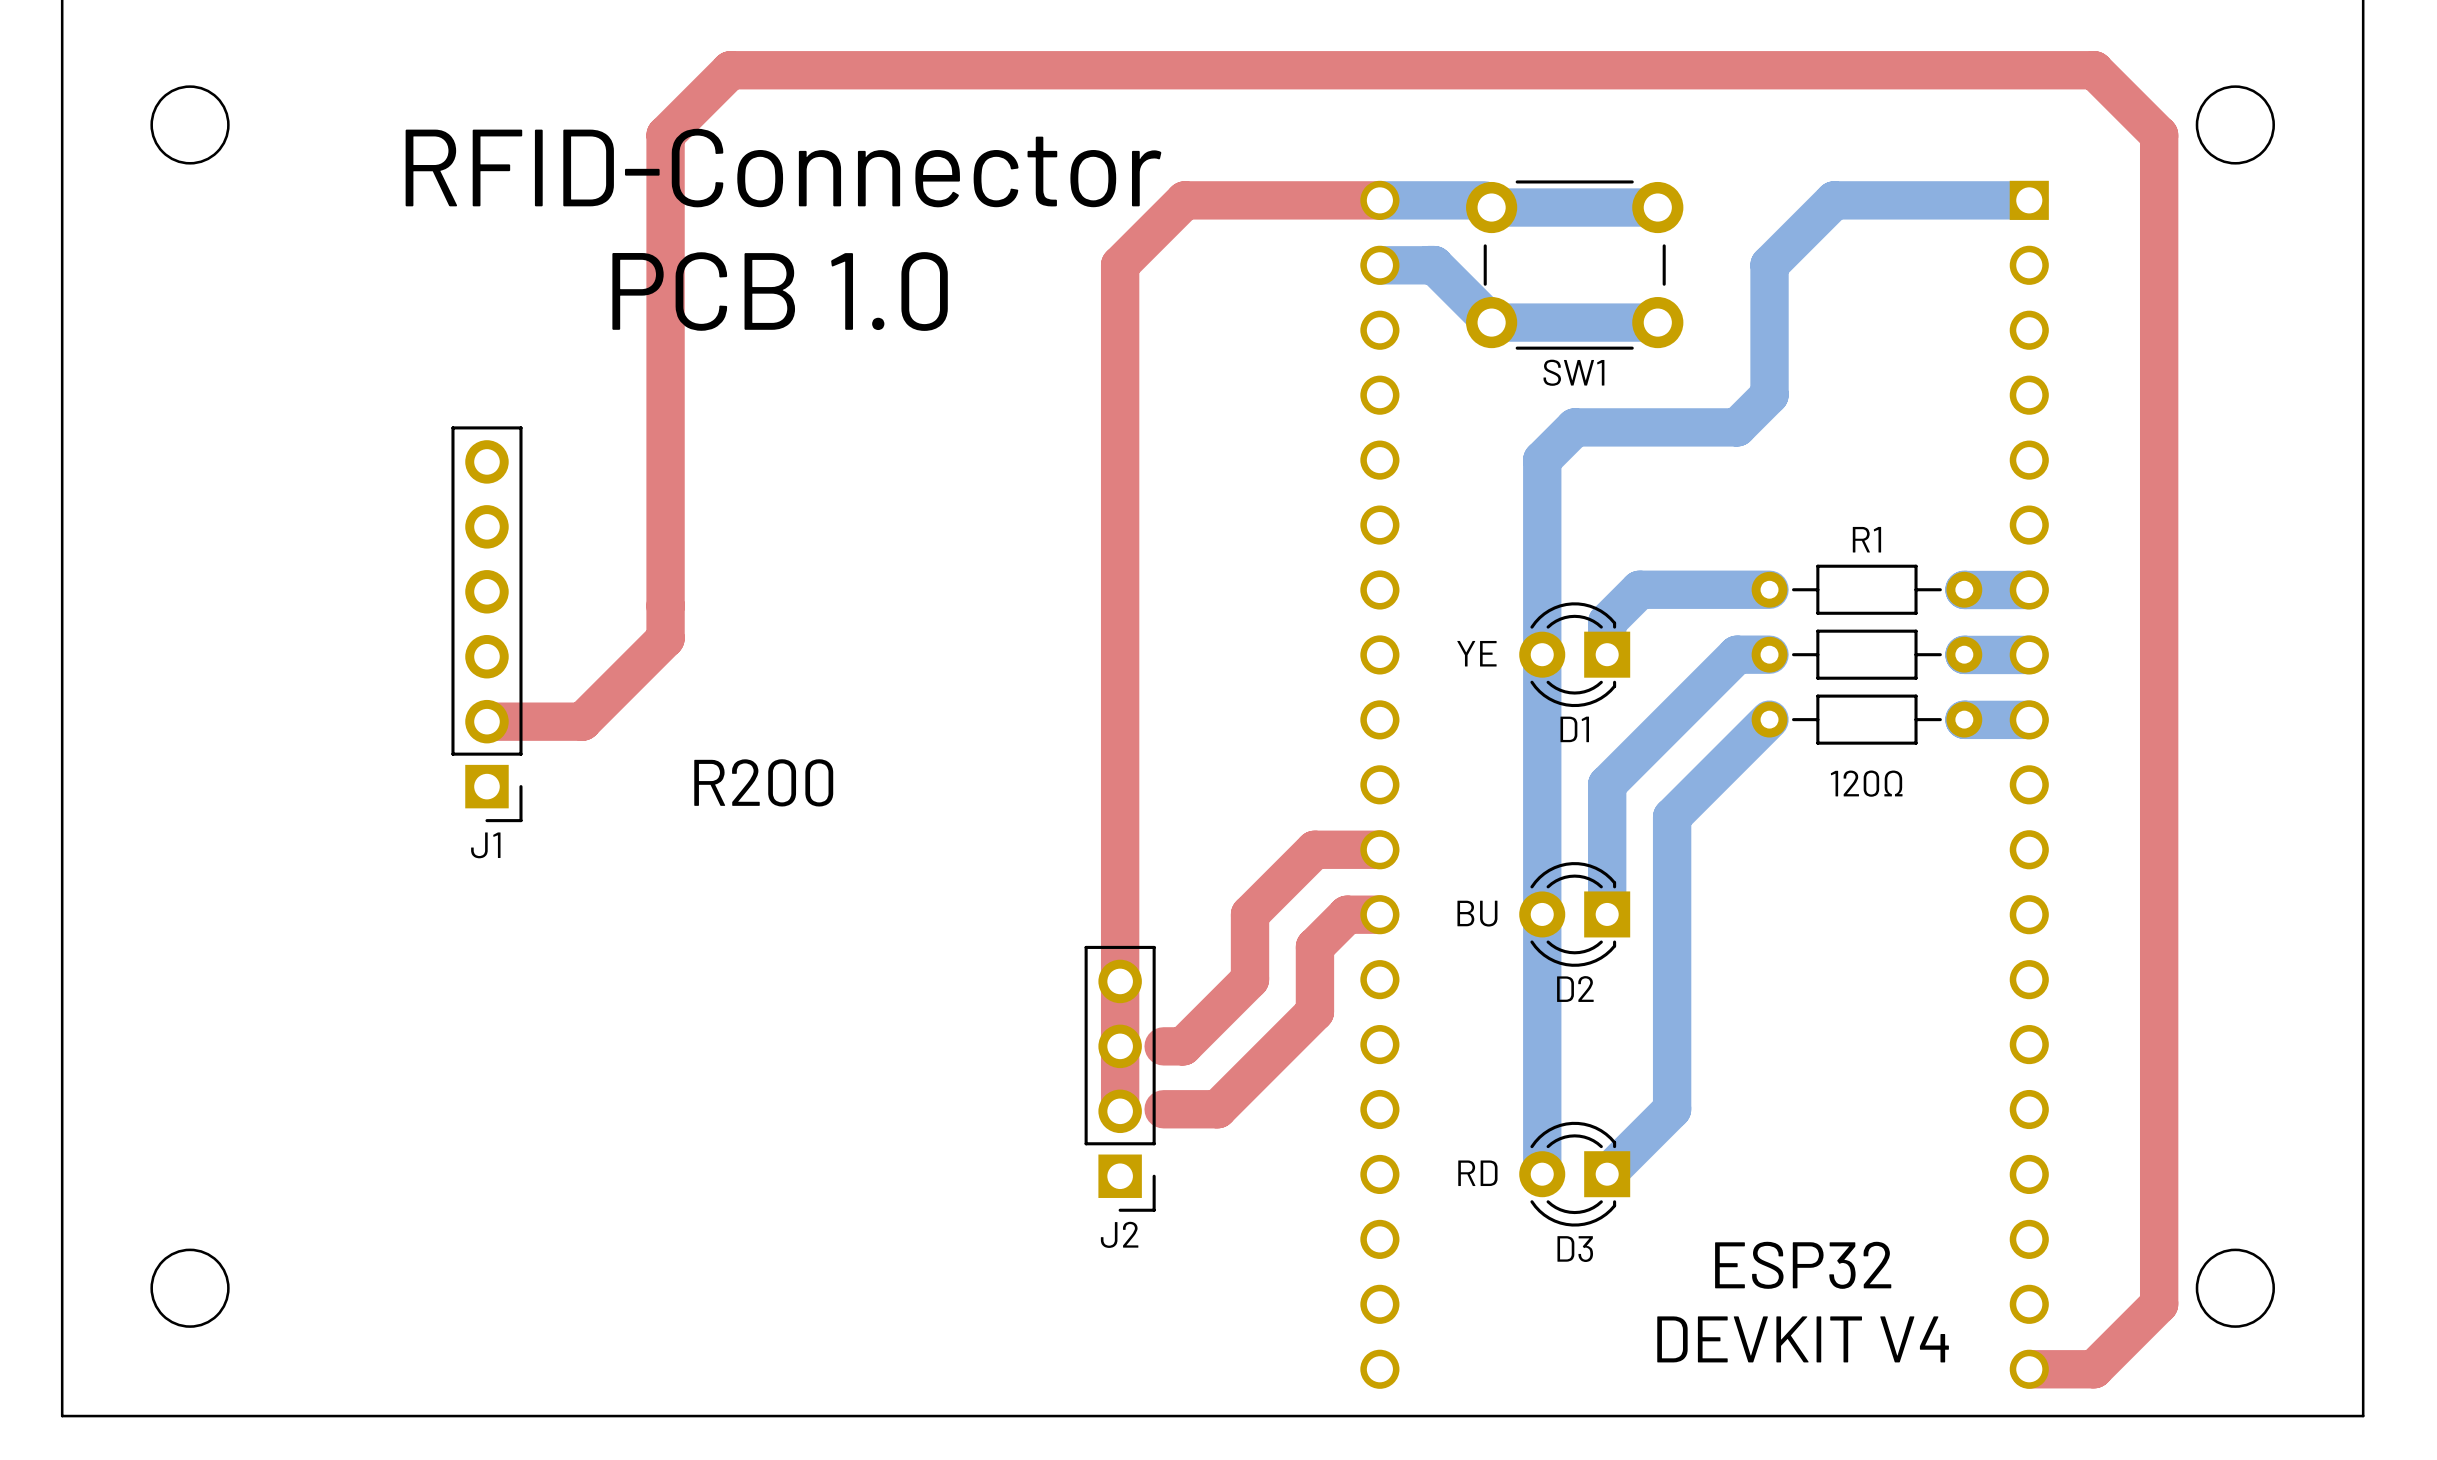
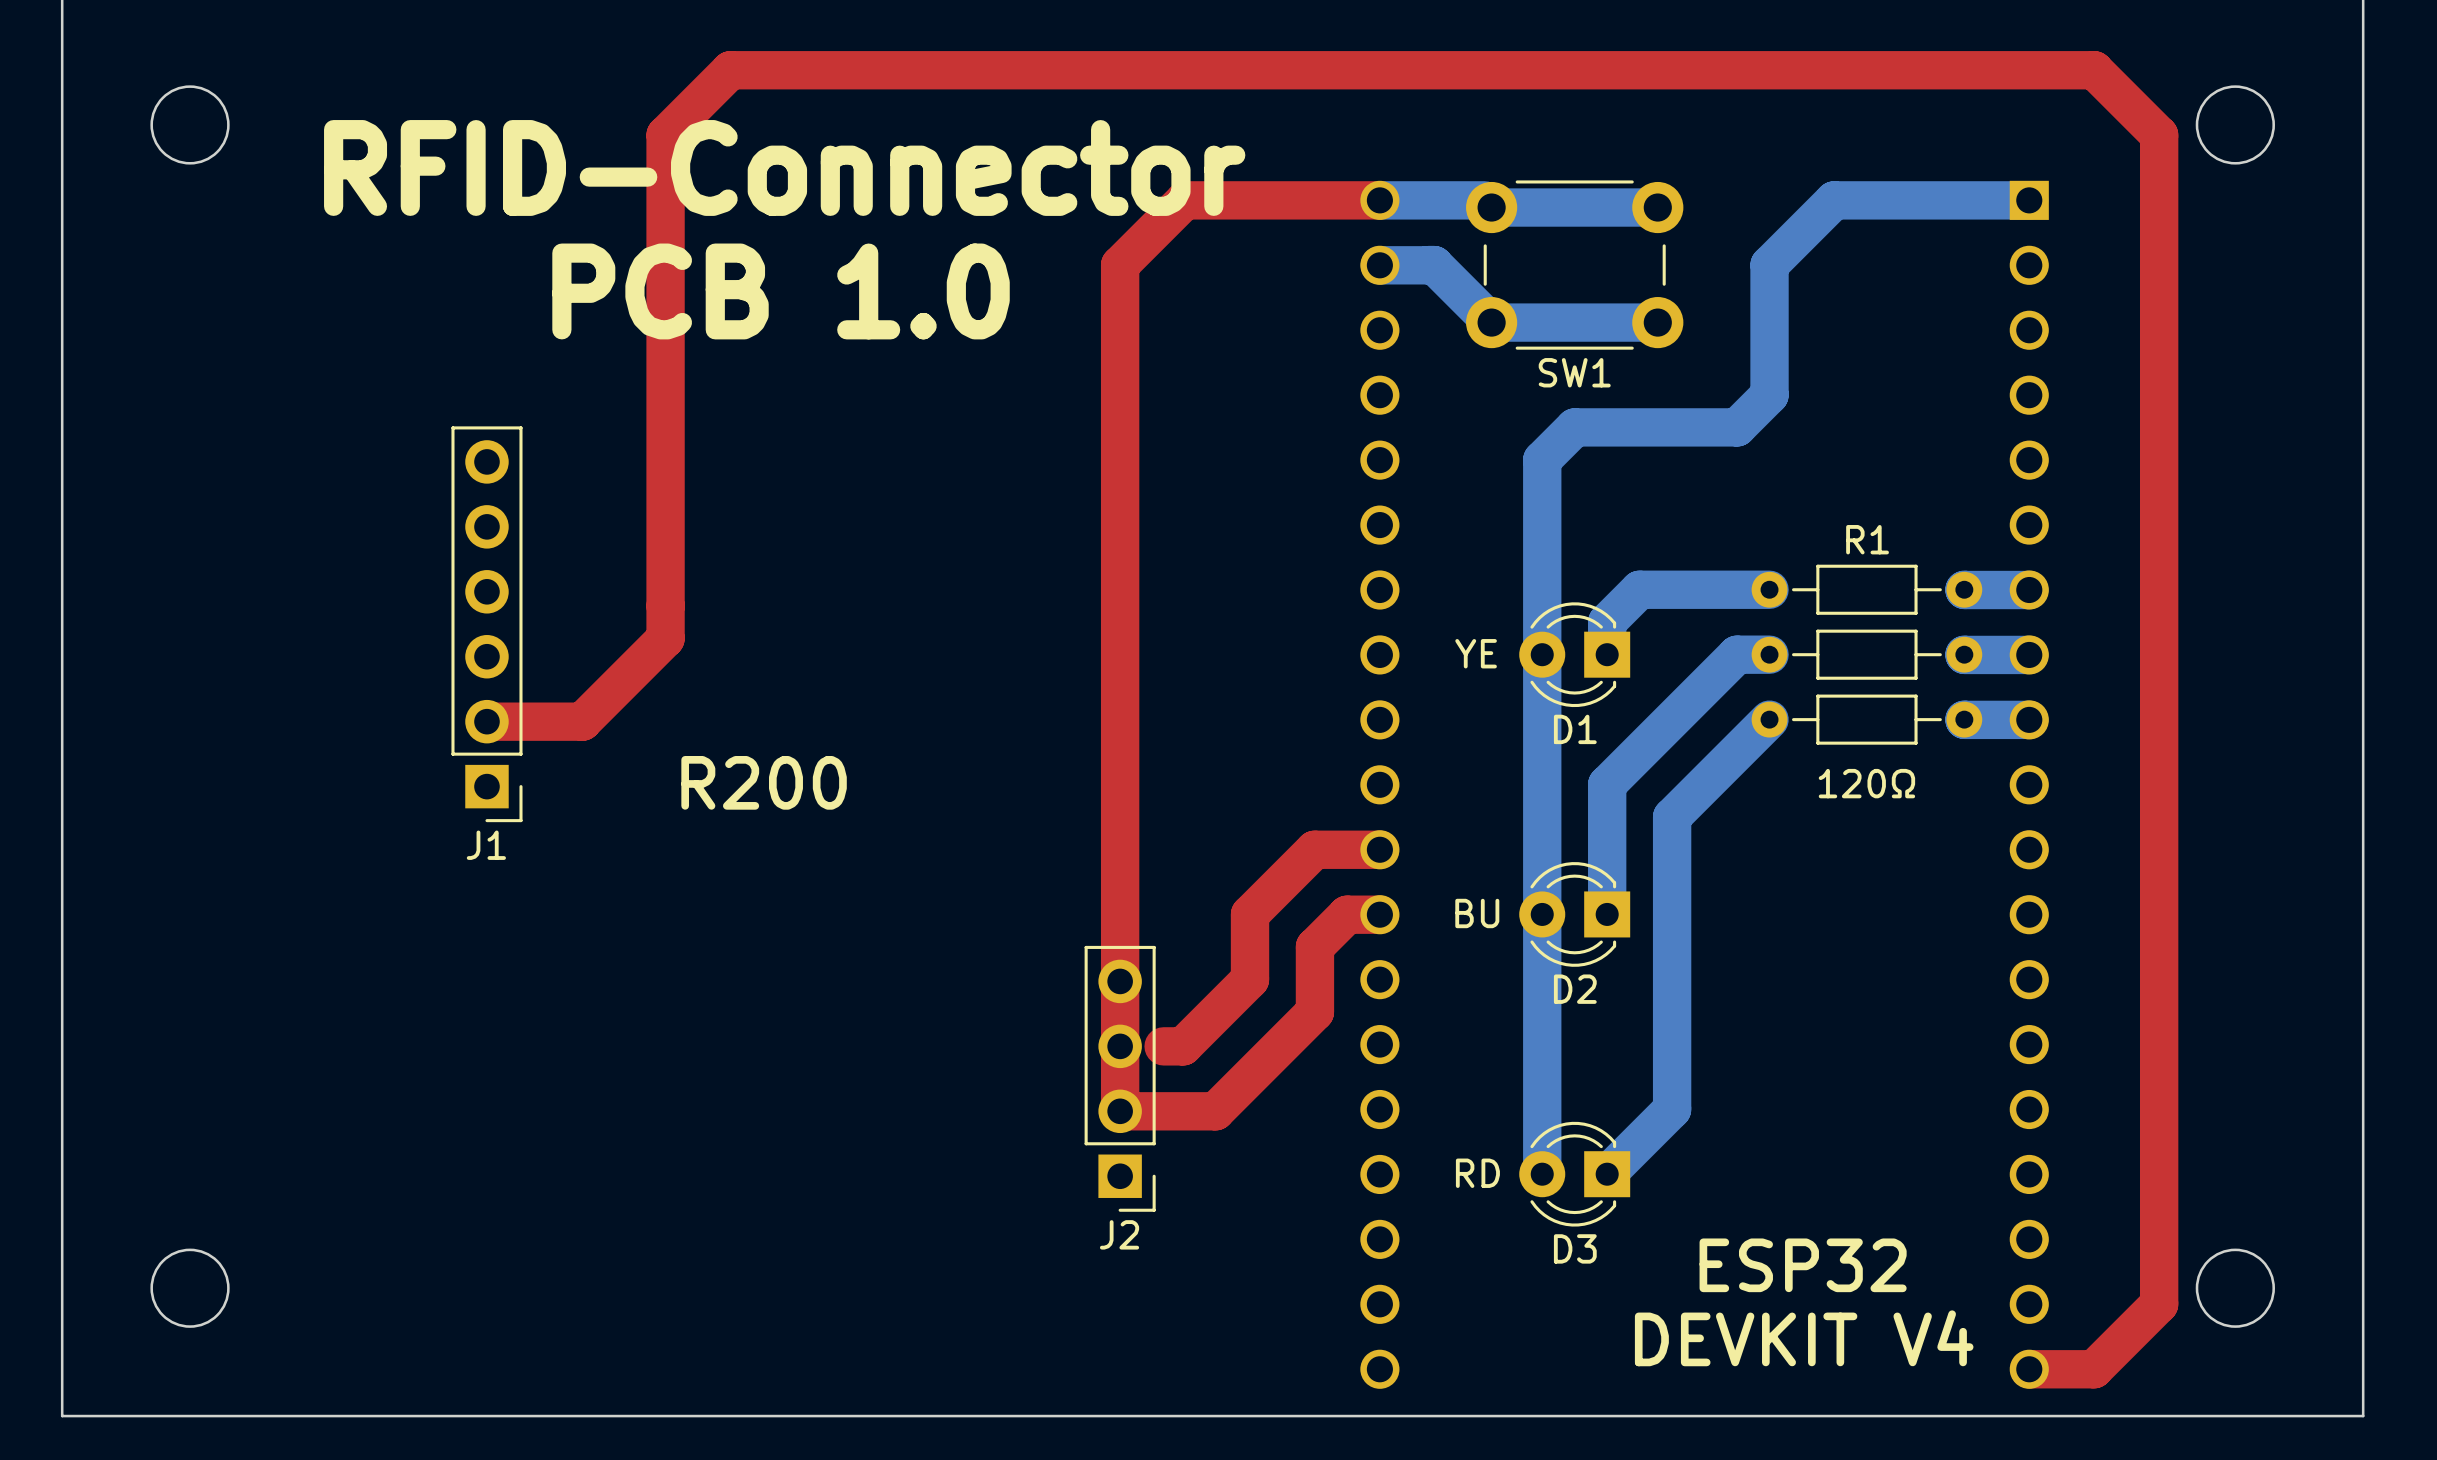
top track: (1163, 1109) (1217, 1109) -> (1120, 1111) (1215, 1111) (1217, 1109)

